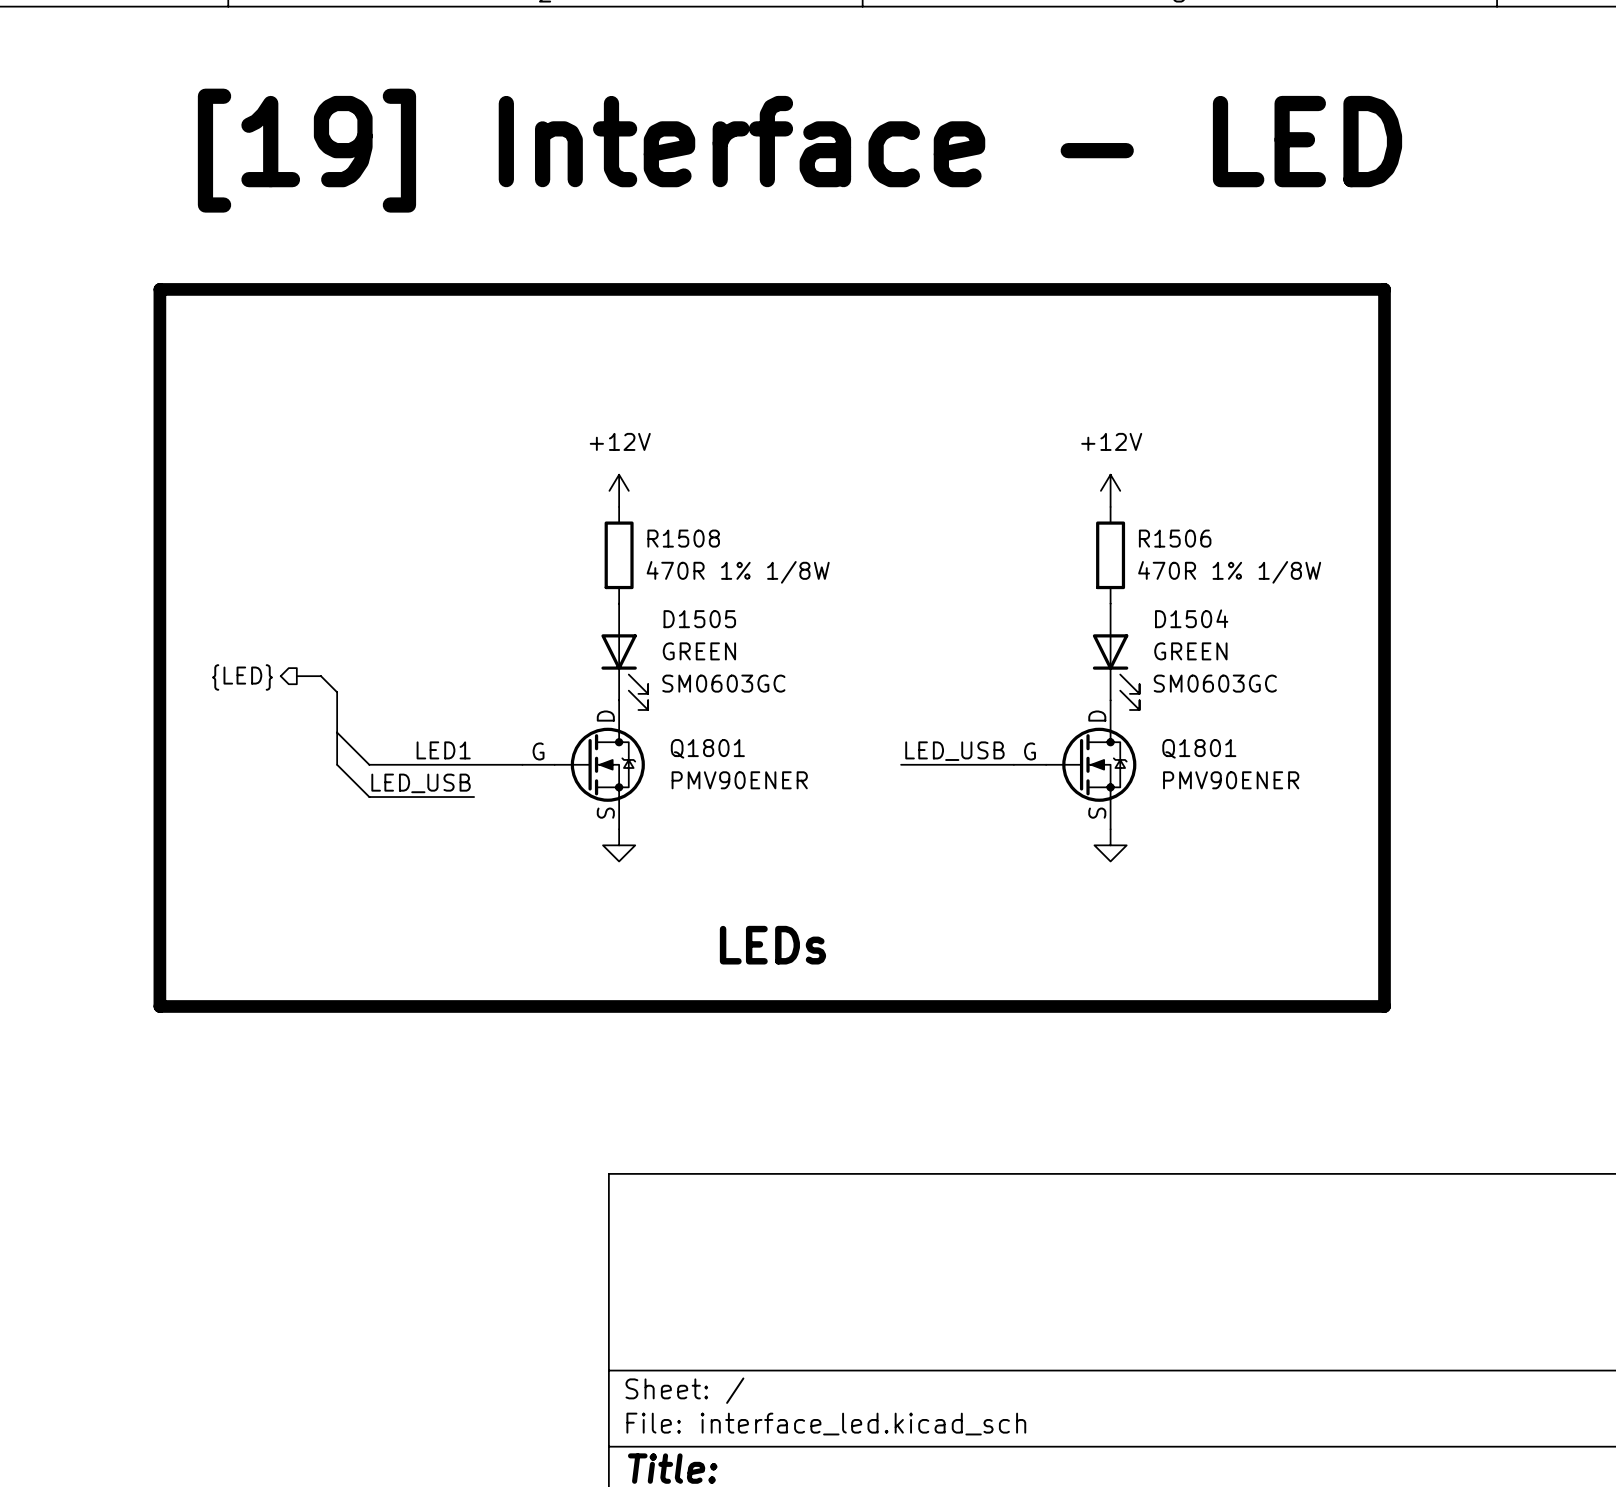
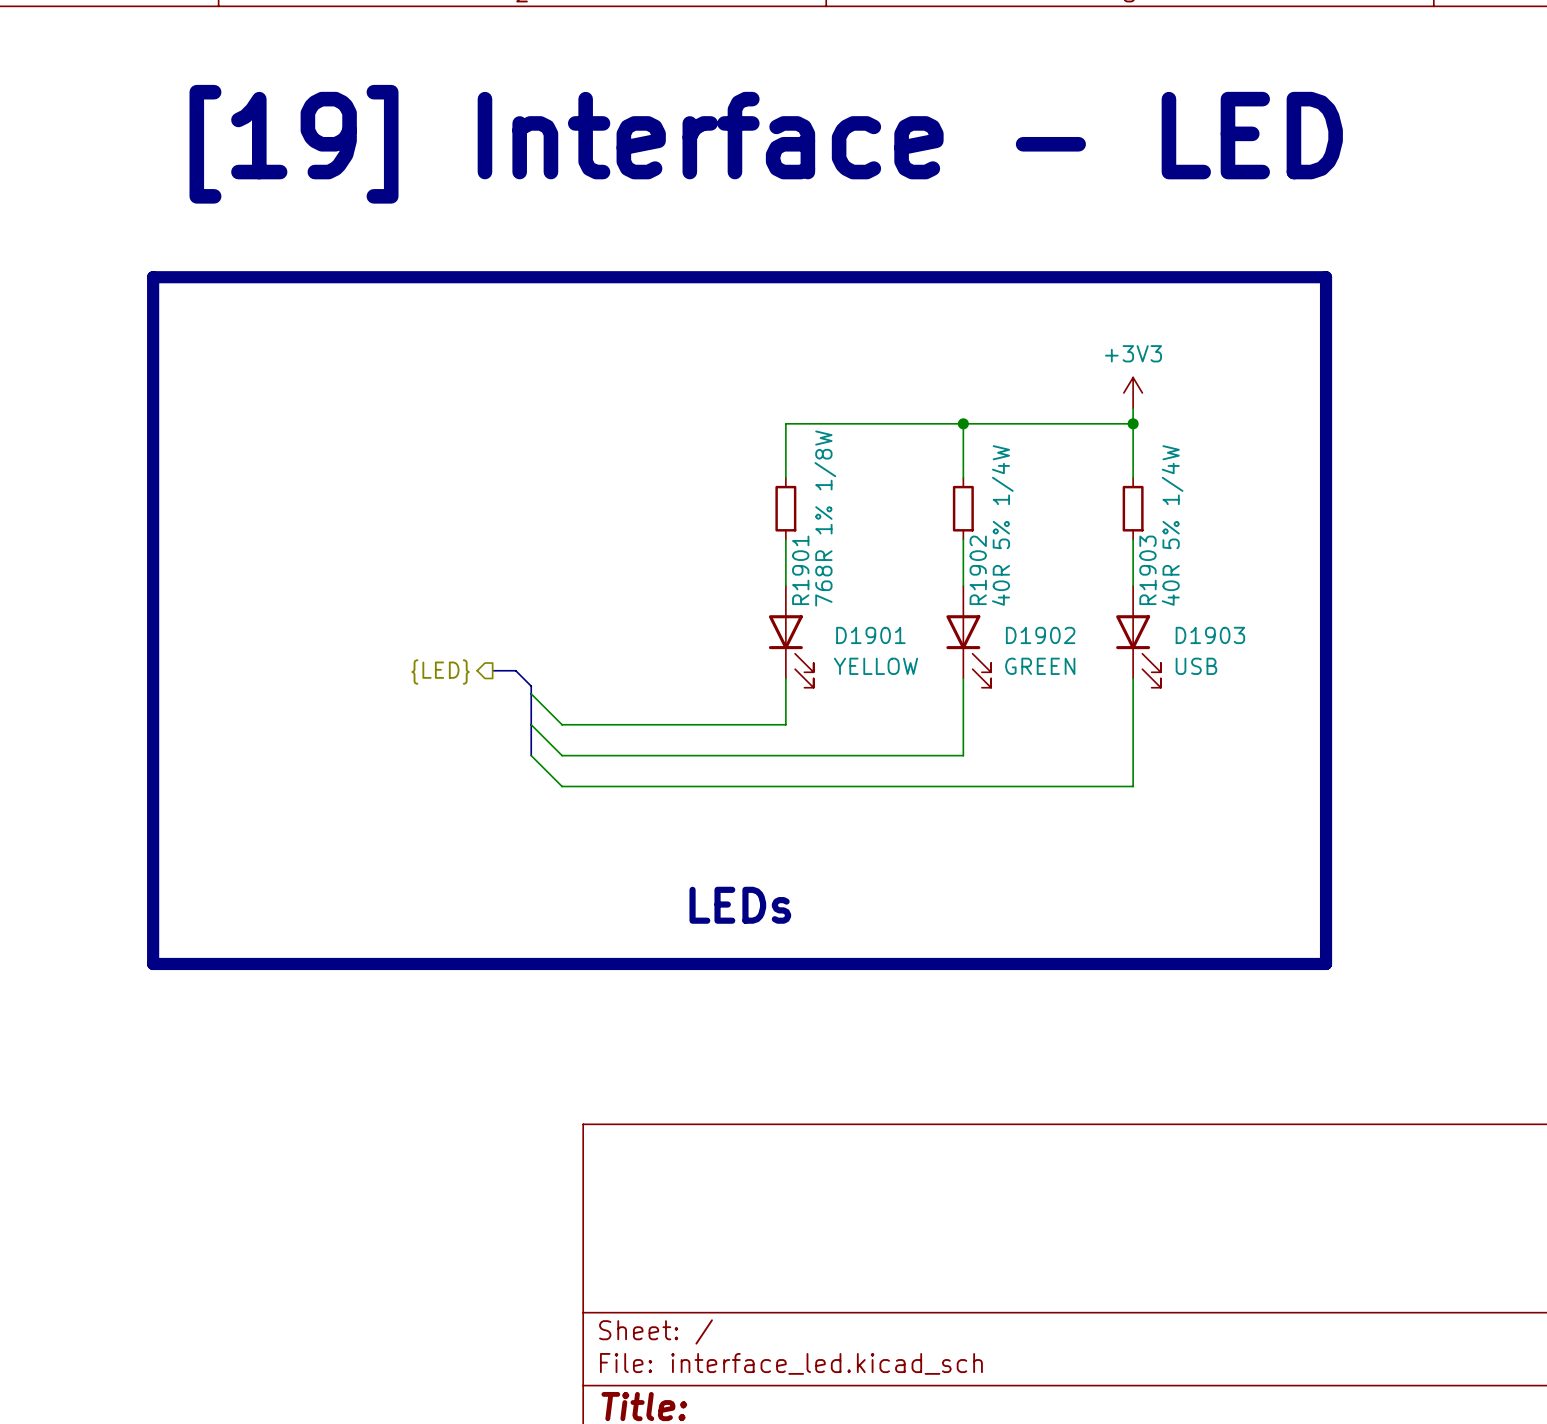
power symbol: none -> +3V3 (1133, 392)
wire: none -> (1133, 408) (1133, 477)
wire: none -> (963, 423) (963, 477)
junction: none -> (963, 423)
wire: none -> (1133, 423) (785, 423) (785, 477)
junction: none -> (1133, 423)
power symbol: +12V (619, 490) -> none
power symbol: +12V (1110, 490) -> none
R1901: none -> 768R 1% 1/8W (785, 508)
R1902: none -> 40R 5% 1/4W (963, 508)
R1903: none -> 40R 5% 1/4W (1133, 508)
R1508: 470R 1% 1/8W (619, 555) -> none
R1506: 470R 1% 1/8W (1110, 555) -> none
wire: none -> (785, 539) (785, 585)
wire: none -> (963, 539) (963, 585)
wire: none -> (1133, 539) (1133, 585)
D1505: GREEN (624, 656) -> none
D1504: GREEN (1116, 656) -> none
D1901: none -> YELLOW (791, 636)
D1902: none -> GREEN (968, 636)
D1903: none -> USB (1138, 636)
bus: (296, 676) (321, 676) (337, 692) (337, 764) -> (492, 670) (515, 670) (531, 686) (531, 755)
hierarchical label position: {LED} (242, 677) -> {LED} (440, 672)
wire: none -> (785, 678) (785, 724) (562, 724) (531, 693)
wire: none -> (963, 678) (963, 755) (562, 755) (531, 724)
wire: none -> (1133, 678) (1133, 786) (562, 786) (531, 755)
wire: (337, 732) (369, 764) (522, 764) -> none
label: LED1 (443, 750) -> none
label: LED_USB (954, 751) -> none
wire: (337, 764) (369, 797) (474, 797) -> none
Q1801: PMV90ENER (583, 764) -> none
wire: (901, 764) (1013, 764) -> none
Q1801: PMV90ENER (1075, 764) -> none
label: LED_USB (421, 783) -> none
power symbol: (619, 845) -> none
power symbol: (1110, 845) -> none

